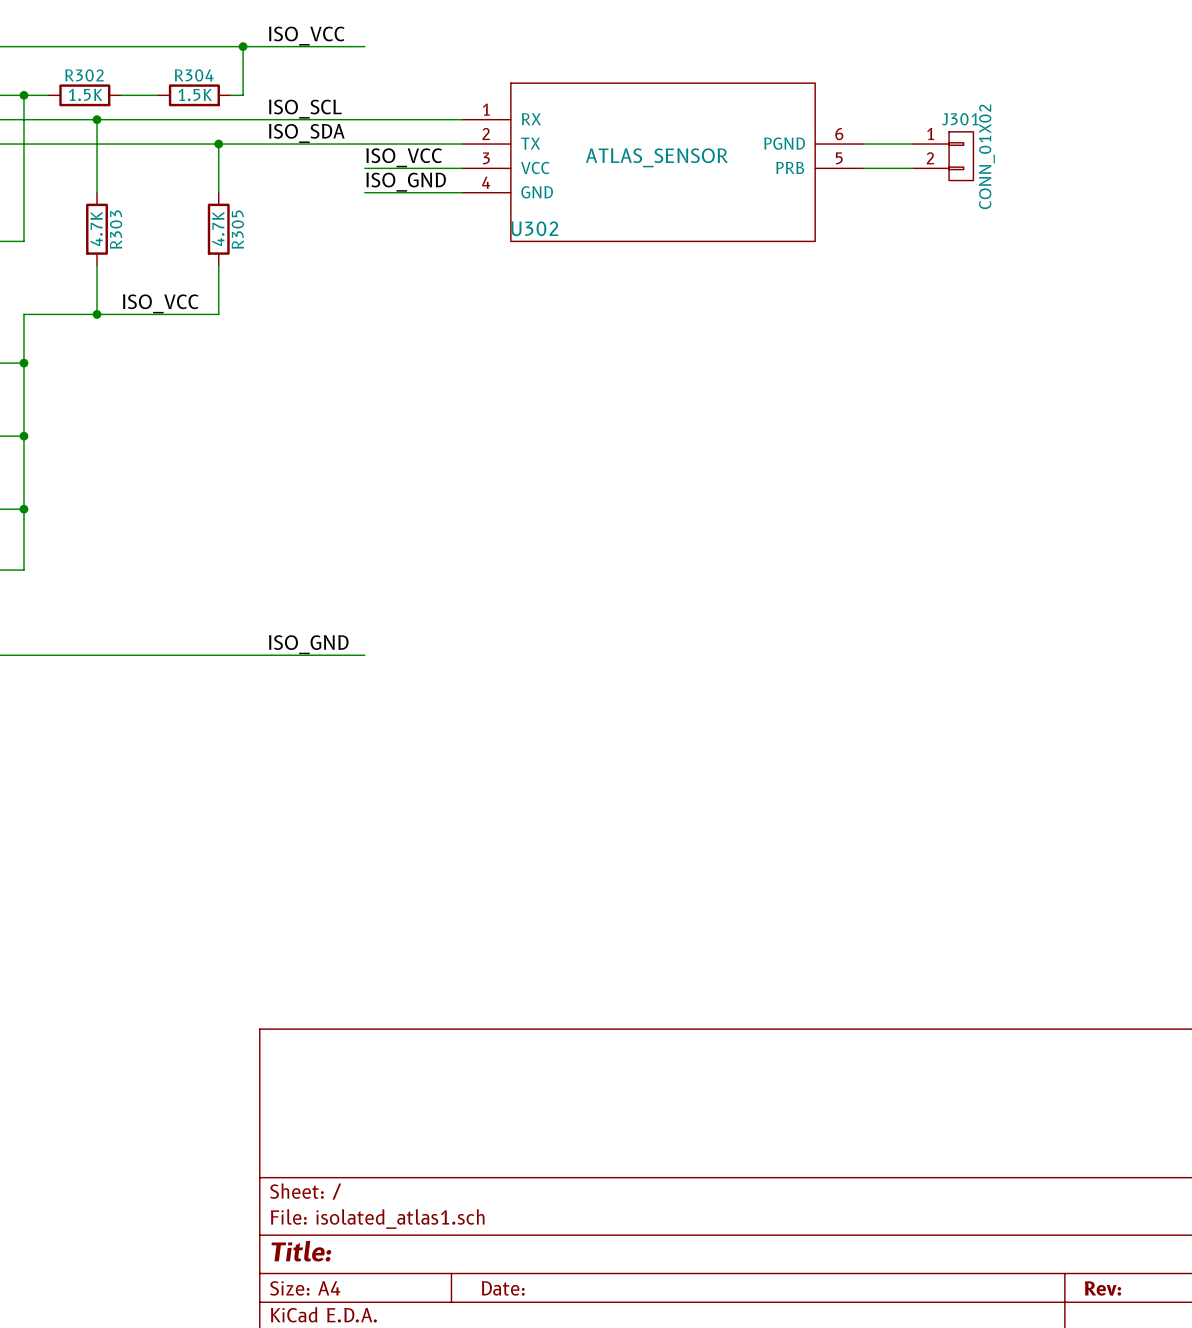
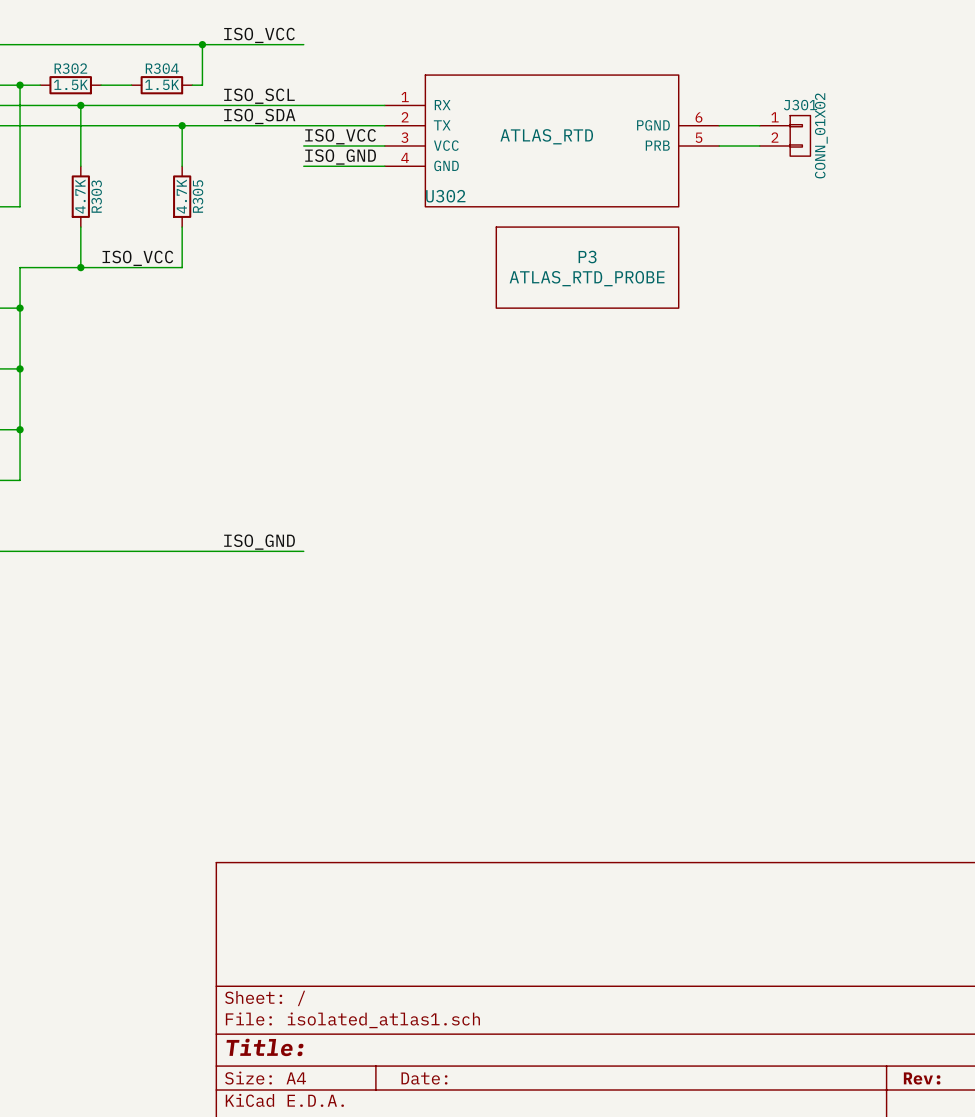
U302 value: ATLAS_SENSOR (656, 157) -> ATLAS_RTD (546, 136)
P3: none -> ATLAS_RTD_PROBE (587, 267)

